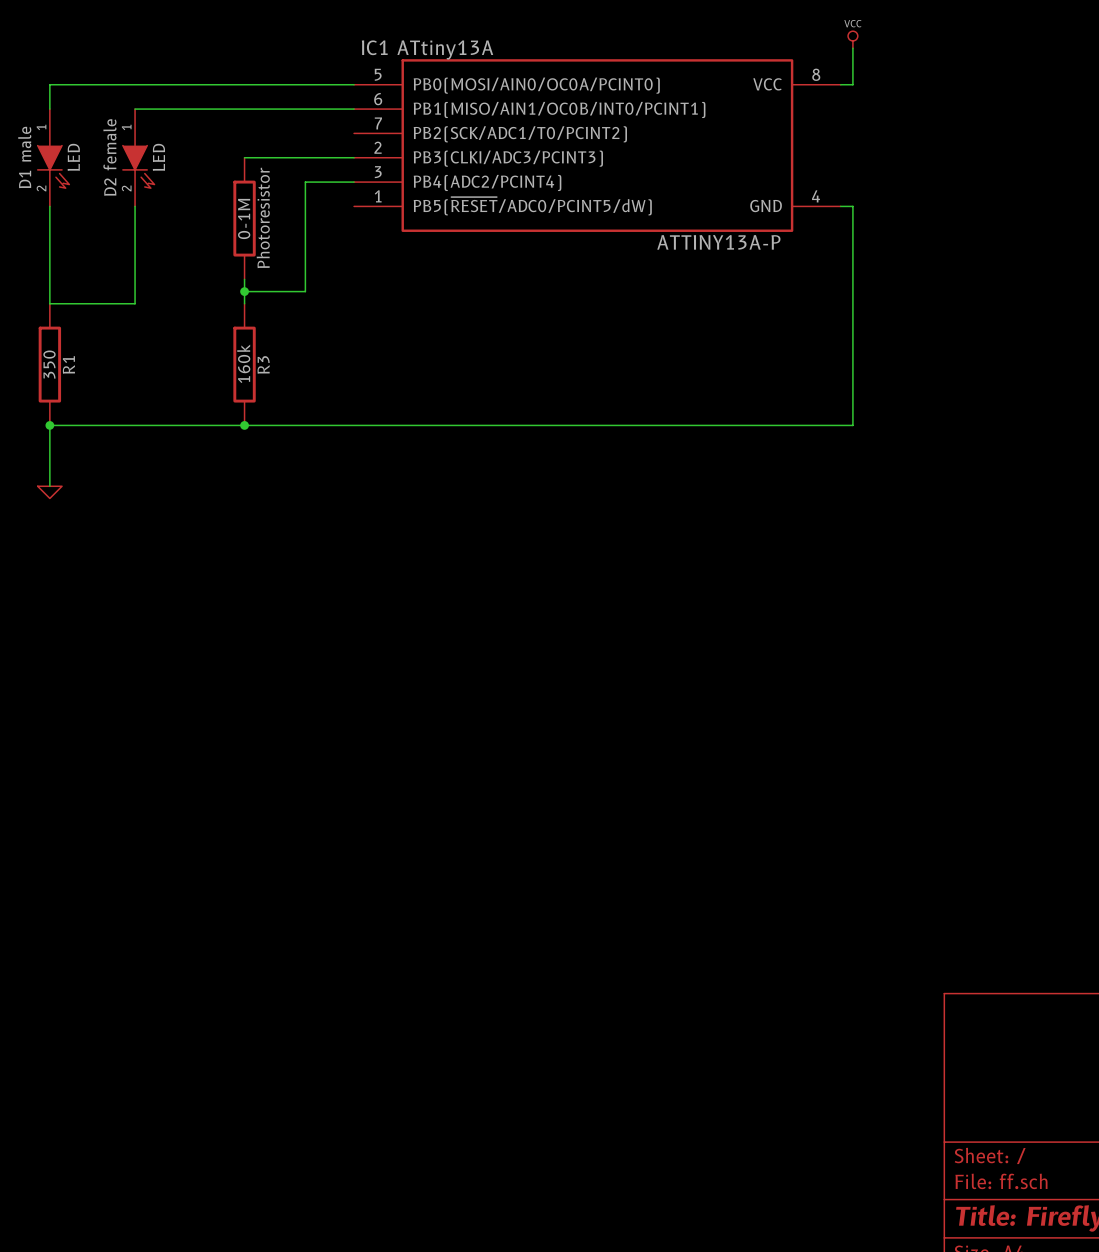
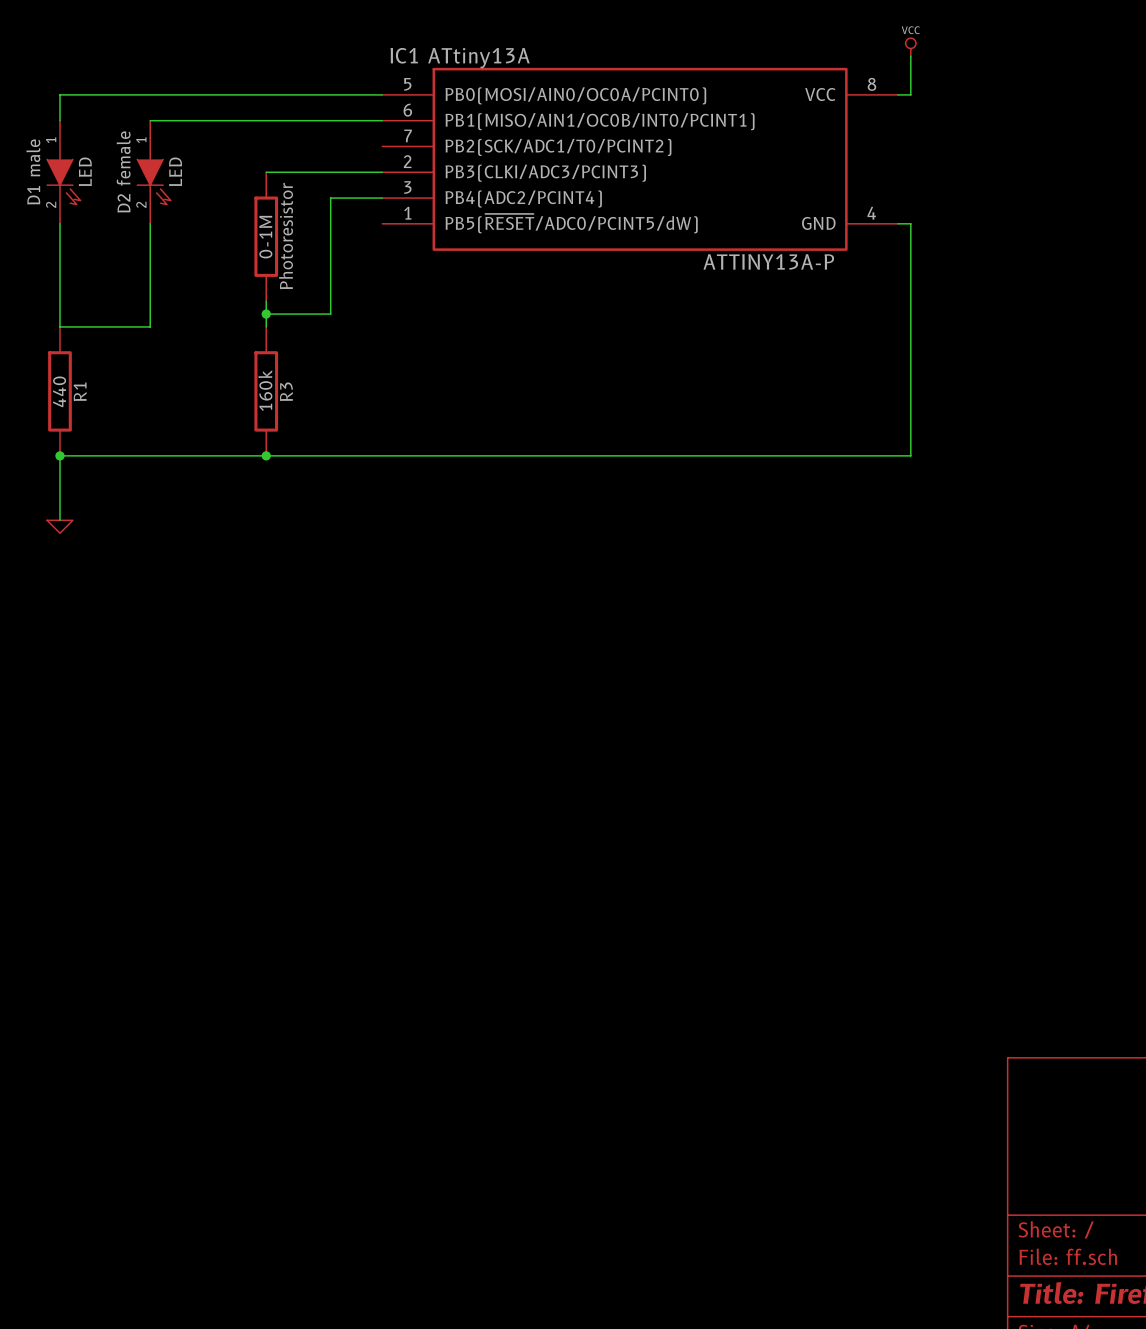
R1 value: 350 (49, 364) -> 440 (59, 391)

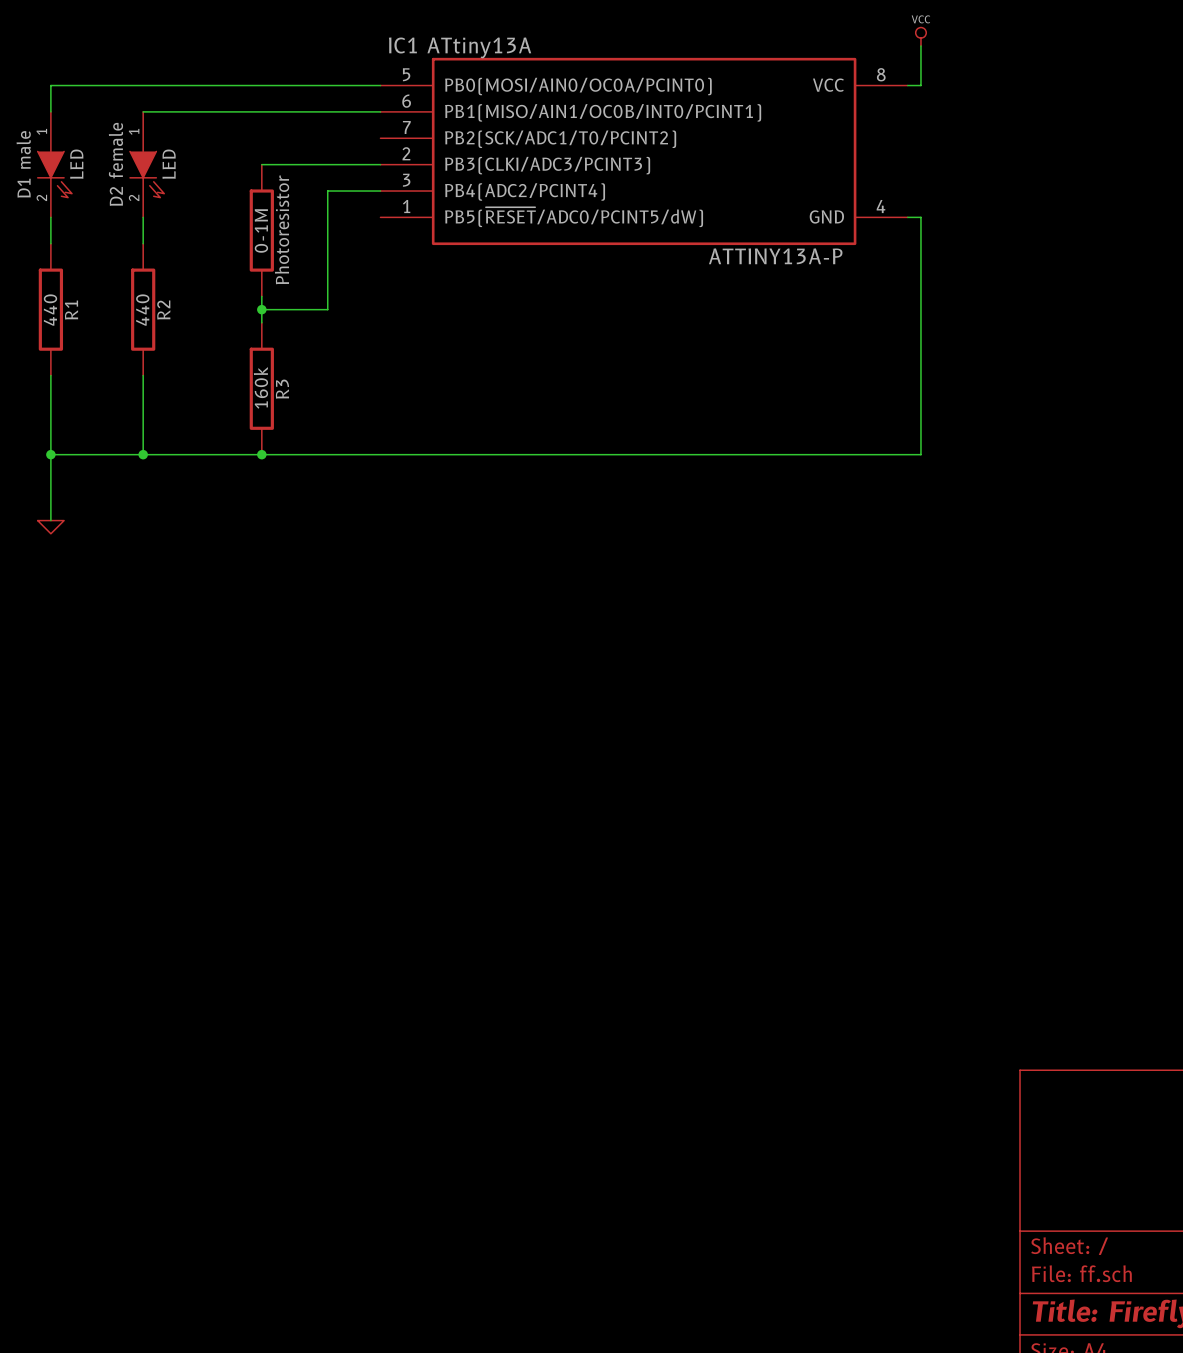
wire: (59, 249) (59, 326) (150, 326) (150, 249) -> none
R2: none -> 440 (143, 309)
wire: none -> (50, 375) (50, 454)
wire: none -> (143, 375) (143, 454)
R1 position: (59, 391) -> (50, 309)
junction: none -> (143, 454)

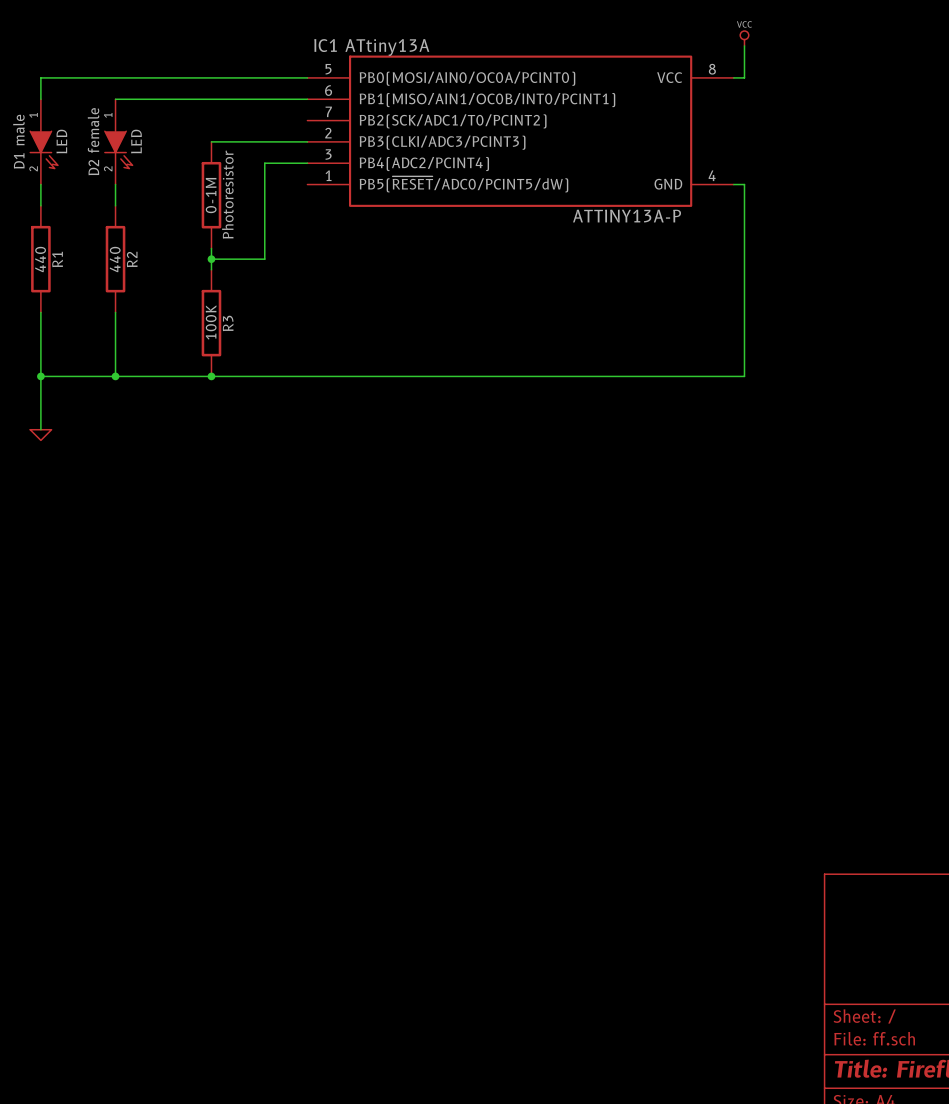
R3 value: 160k (260, 387) -> 100K (211, 322)

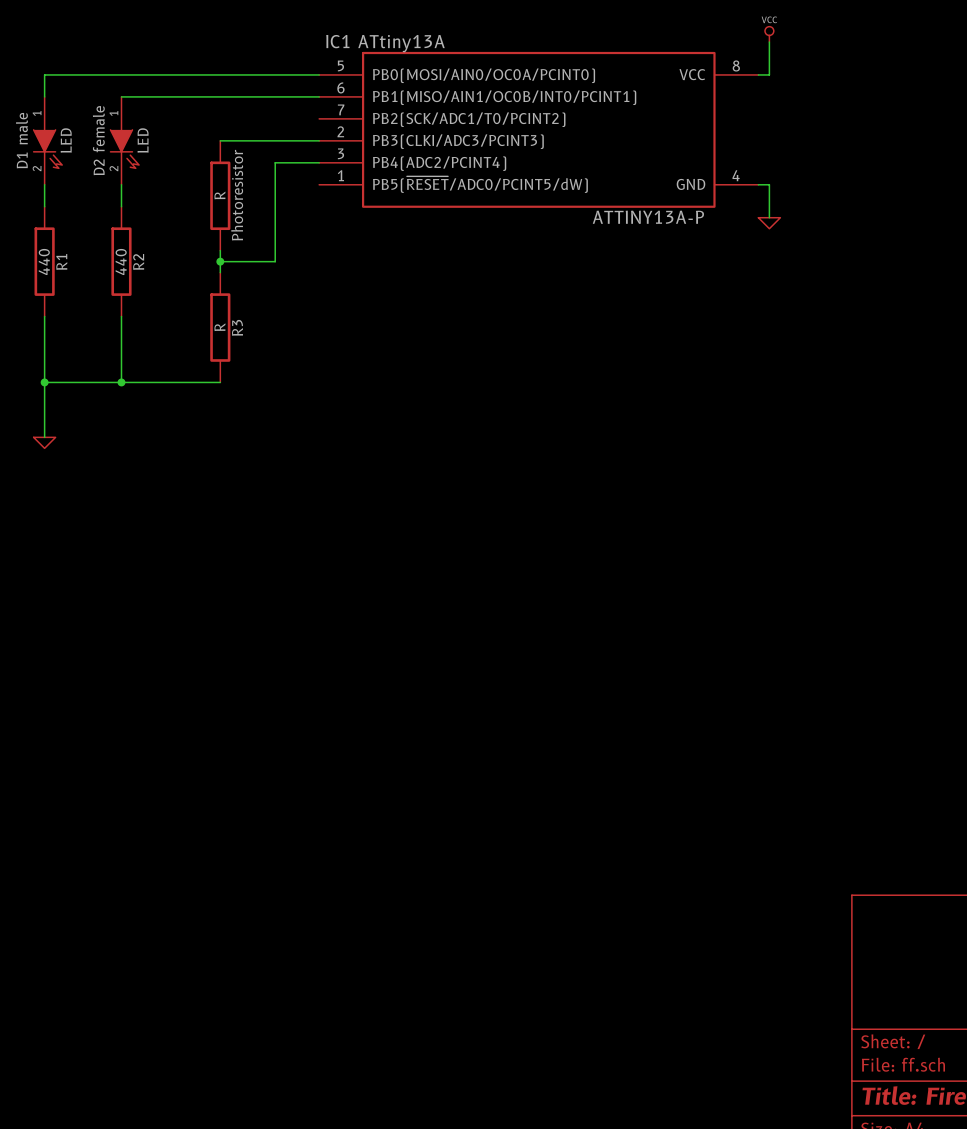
Photoresistor value: 0-1M (211, 195) -> R (219, 195)
wire: (744, 216) (744, 376) (211, 376) -> none
power symbol: none -> (769, 223)
R3 value: 100K (211, 322) -> R (219, 327)
junction: (211, 376) -> none

